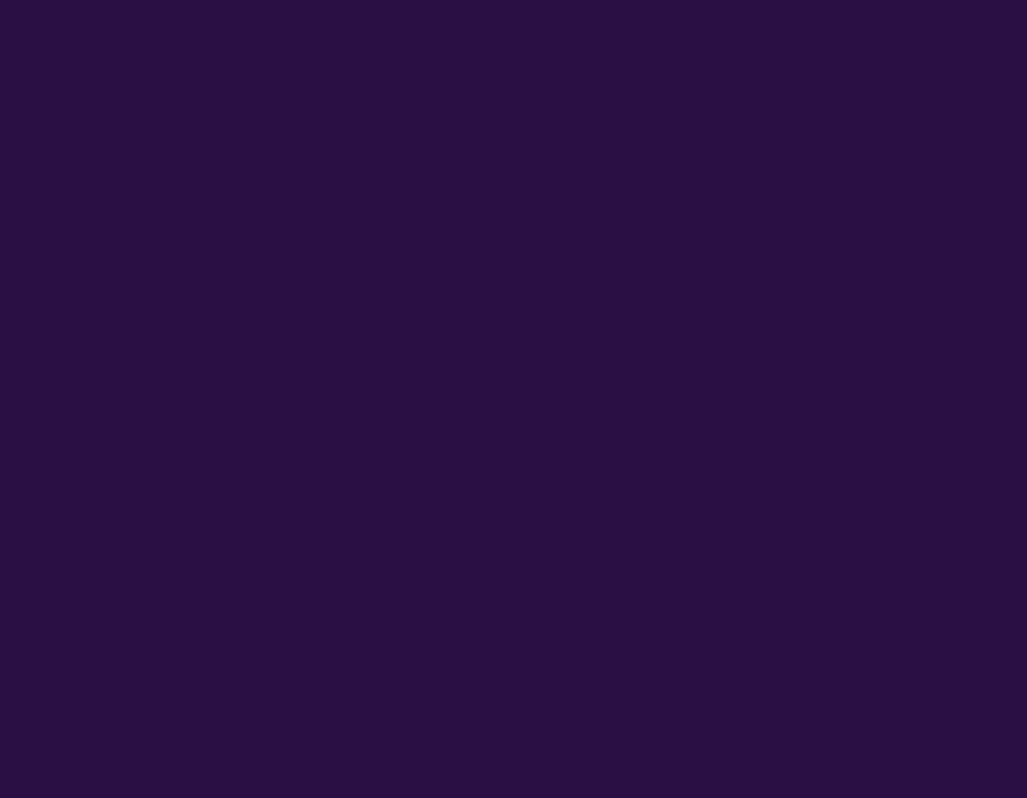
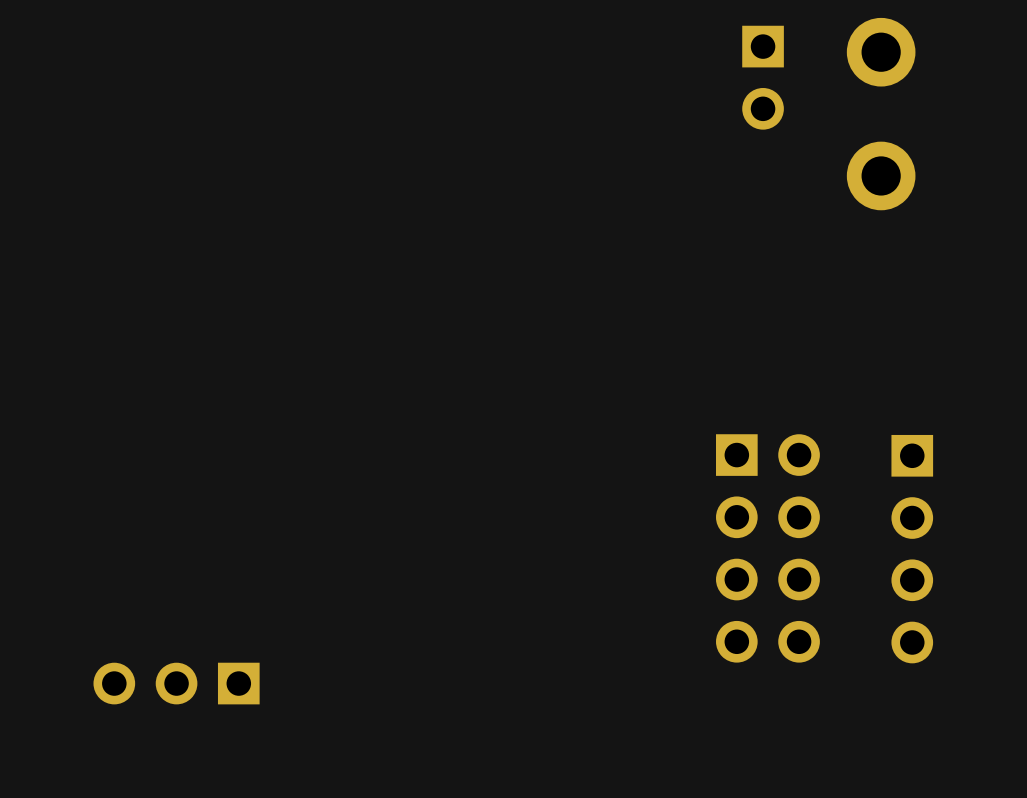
part: none -> (881, 52)
part: none -> (763, 77)
part: none -> (881, 175)
part: none -> (767, 548)
part: none -> (912, 549)
part: none -> (176, 683)

